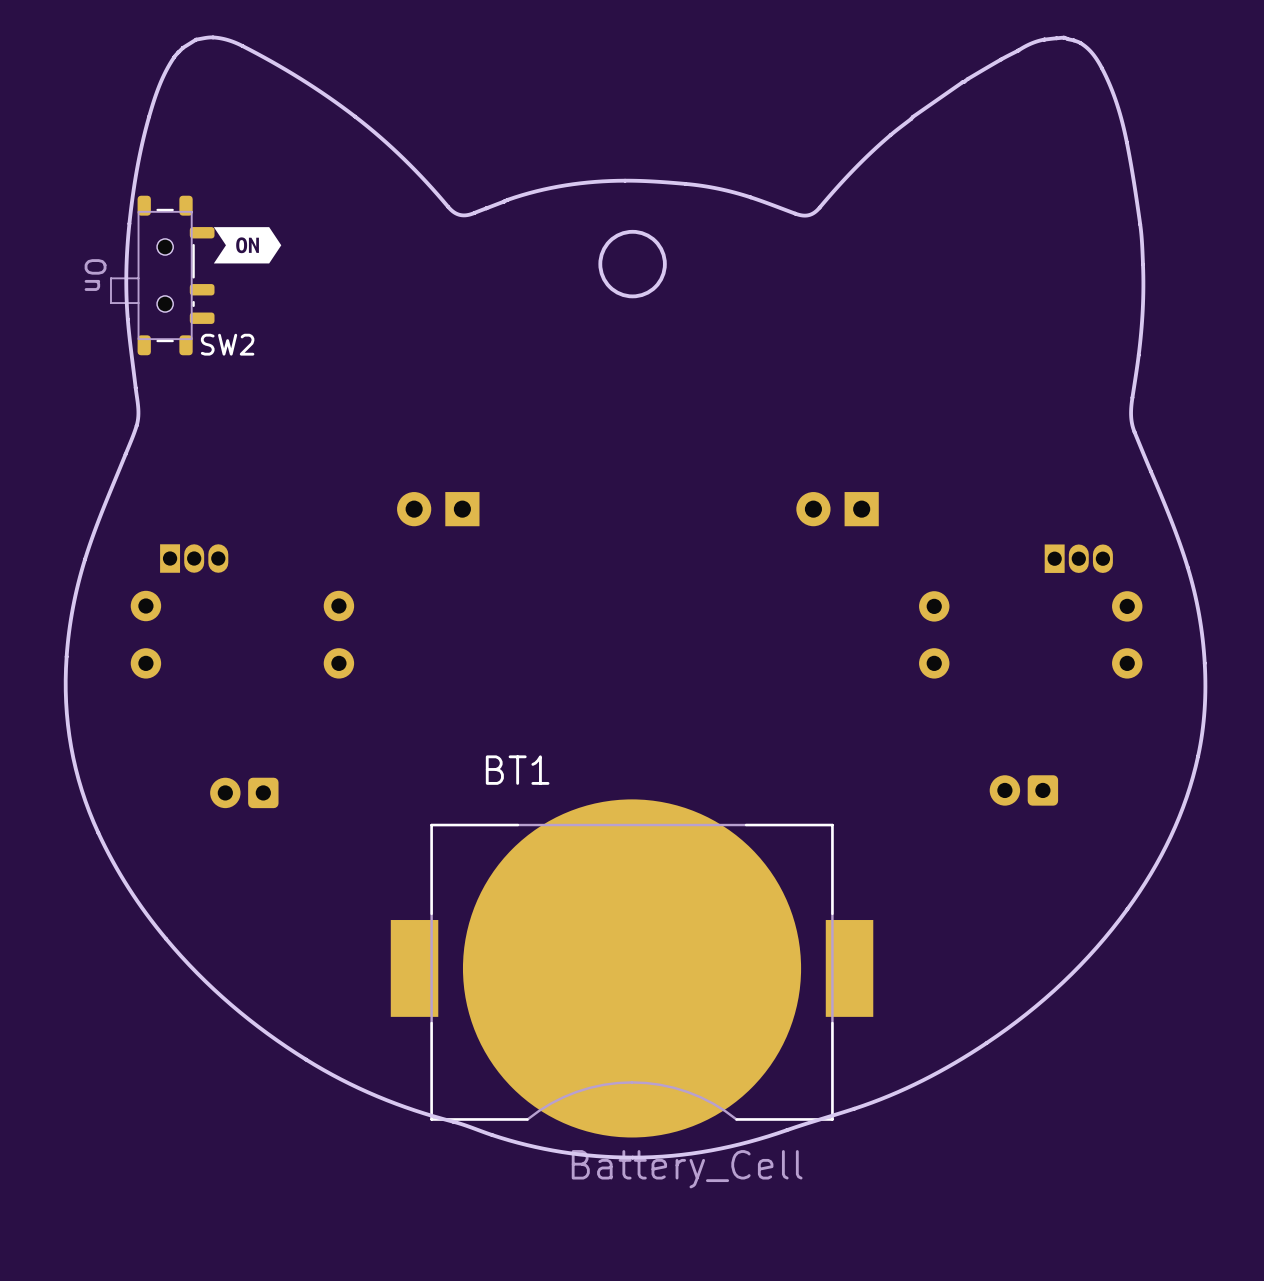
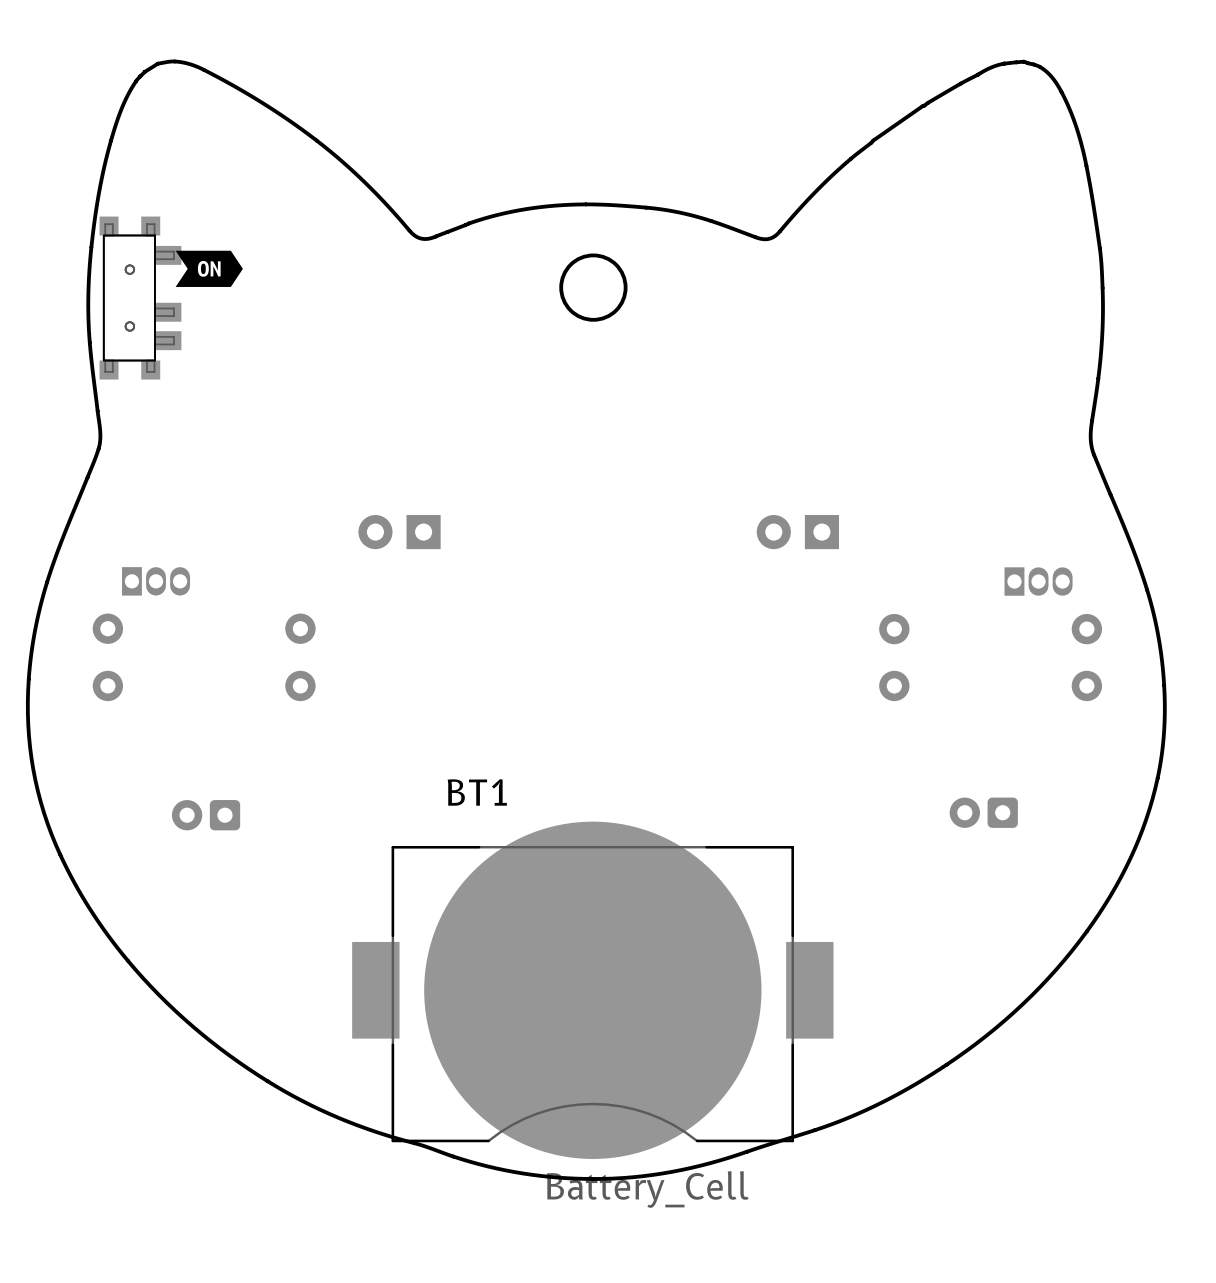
part: none -> (140, 298)
SW2: On (162, 275) -> none

